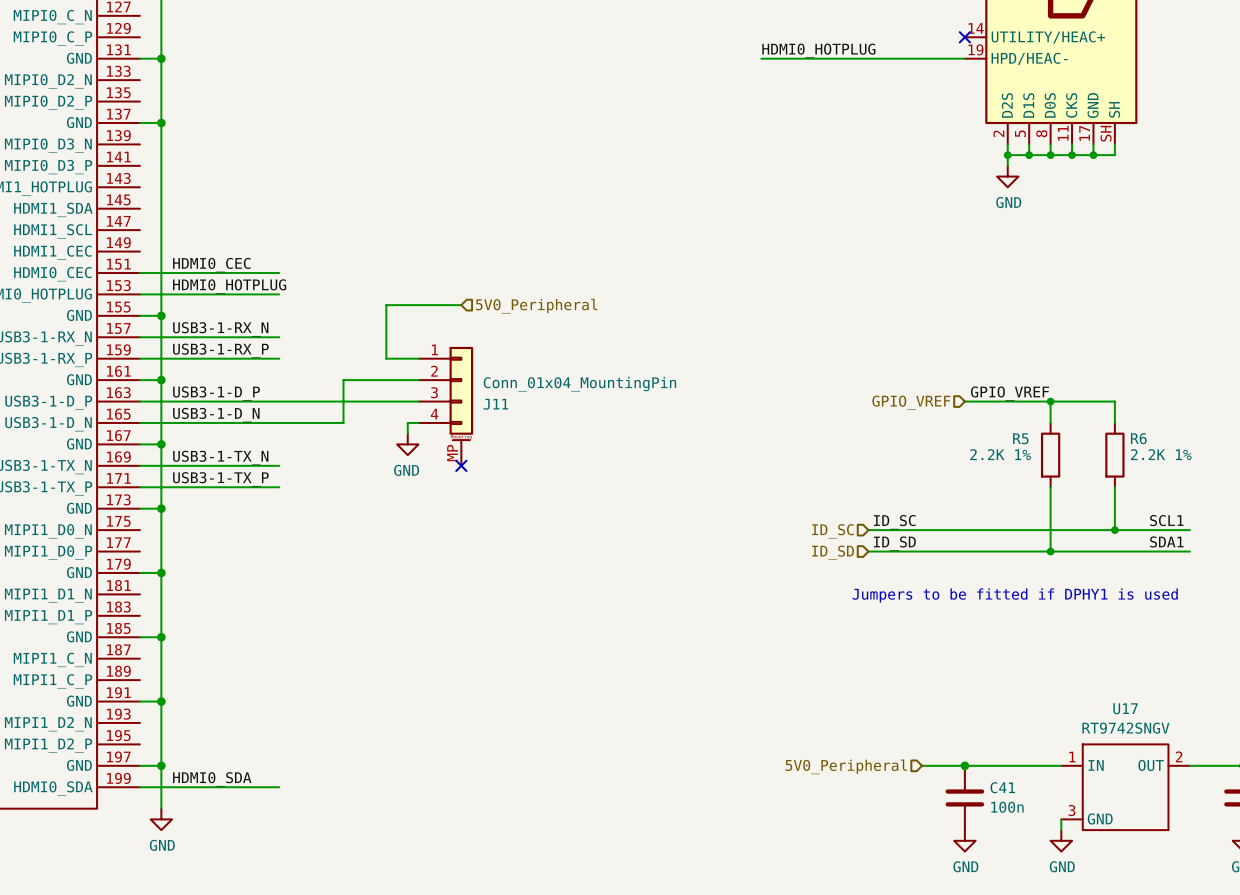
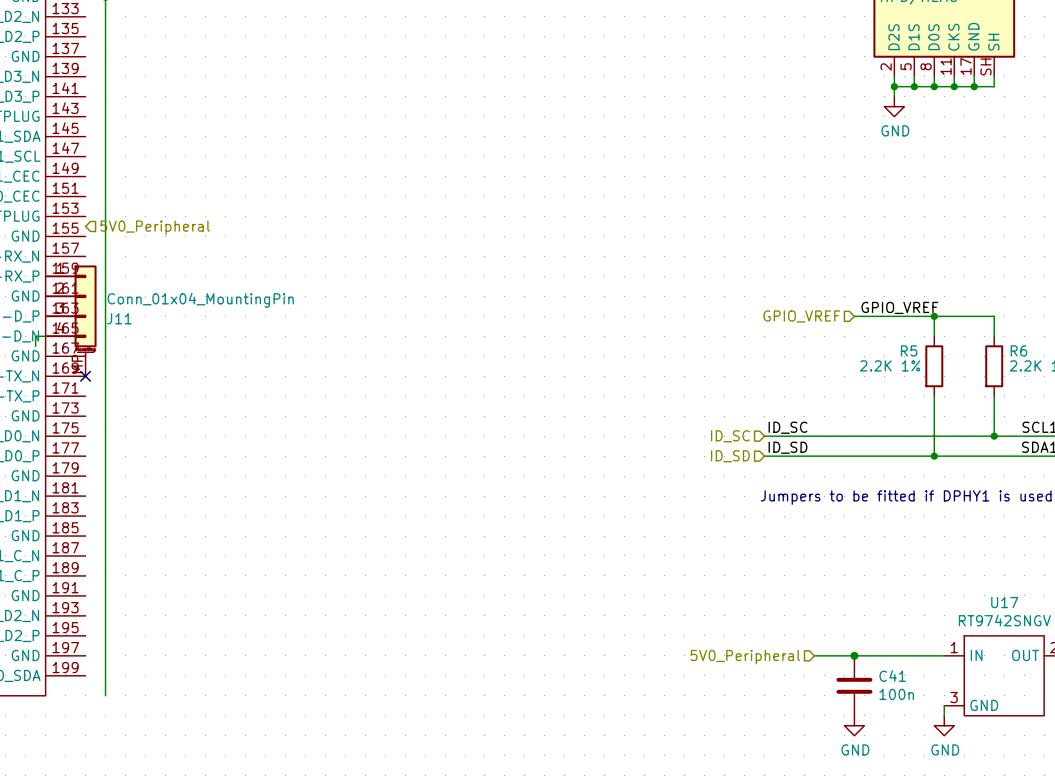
wire: (139, 122) (161, 122) -> none
junction: (161, 122) -> none
label: HDMI0_CEC (211, 265) -> none
wire: (139, 272) (279, 272) -> none
label: HDMI0_HOTPLUG (229, 286) -> none
wire: (139, 294) (279, 294) -> none
wire: (461, 305) (386, 305) (386, 358) (418, 358) -> none
hierarchical label: none -> 5V0_Peripheral (155, 227)
hierarchical label: 5V0_Peripheral (536, 306) -> none
wire: (139, 315) (161, 315) -> none
junction: (161, 315) -> none
label: USB3-1-RX_N (220, 329) -> none
wire: (139, 337) (279, 337) -> none
label: USB3-1-RX_P (220, 350) -> none
wire: (139, 358) (279, 358) -> none
junction: (161, 380) -> none
wire: (418, 380) (343, 380) (343, 422) (139, 422) -> none
label: USB3-1-D_P (216, 393) -> none
wire: (139, 401) (418, 401) -> none
J11 position: (445, 406) -> (71, 320)
label: USB3-1-D_N (216, 415) -> none
wire: none -> (45, 336) (35, 336) (35, 346)
wire: (418, 422) (407, 422) (407, 433) -> none
wire: (139, 444) (161, 444) -> none
junction: (161, 444) -> none
power symbol: GND (407, 444) -> none
label: USB3-1-TX_N (220, 457) -> none
wire: (139, 465) (279, 465) -> none
no-connect mark: none -> (85, 376)
no-connect mark: (461, 465) -> none
label: USB3-1-TX_P (220, 479) -> none
wire: (139, 487) (279, 487) -> none
wire: (139, 508) (161, 508) -> none
junction: (161, 508) -> none
wire: (139, 572) (161, 572) -> none
junction: (161, 572) -> none
wire: (139, 637) (161, 637) -> none
junction: (161, 637) -> none
wire: (139, 701) (161, 701) -> none
junction: (161, 701) -> none
wire: (139, 765) (161, 765) -> none
junction: (161, 765) -> none
label: HDMI0_SDA (212, 779) -> none
wire: (139, 787) (279, 787) -> none
power symbol: GND (161, 819) -> none

